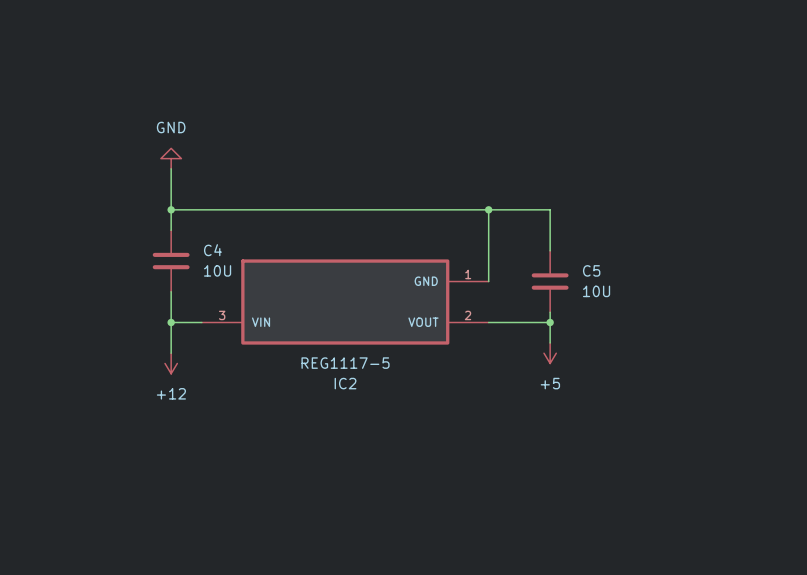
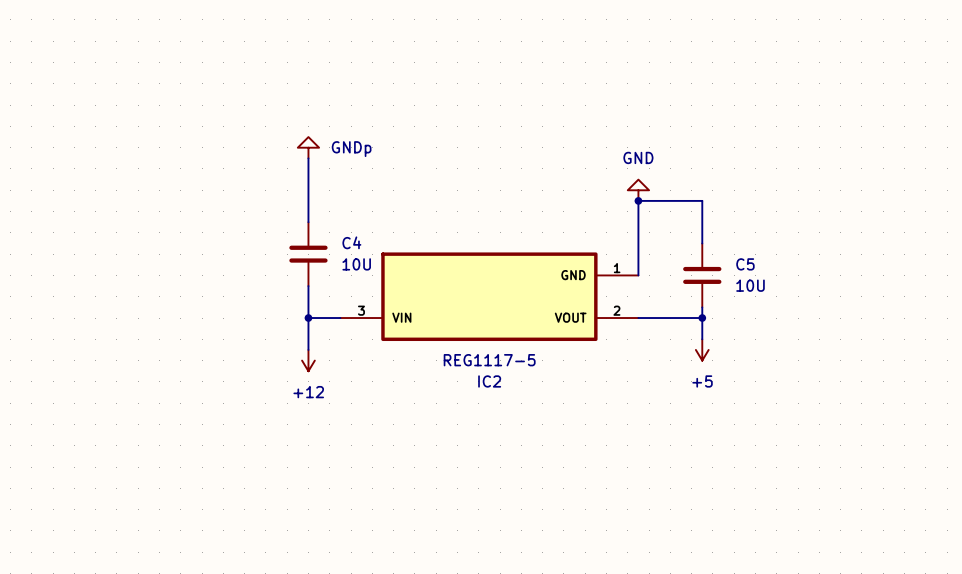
power symbol: GND (171, 158) -> GNDp (308, 147)
power symbol: none -> GND (638, 190)
wire: (171, 209) (488, 209) -> none
junction: (171, 209) -> none

